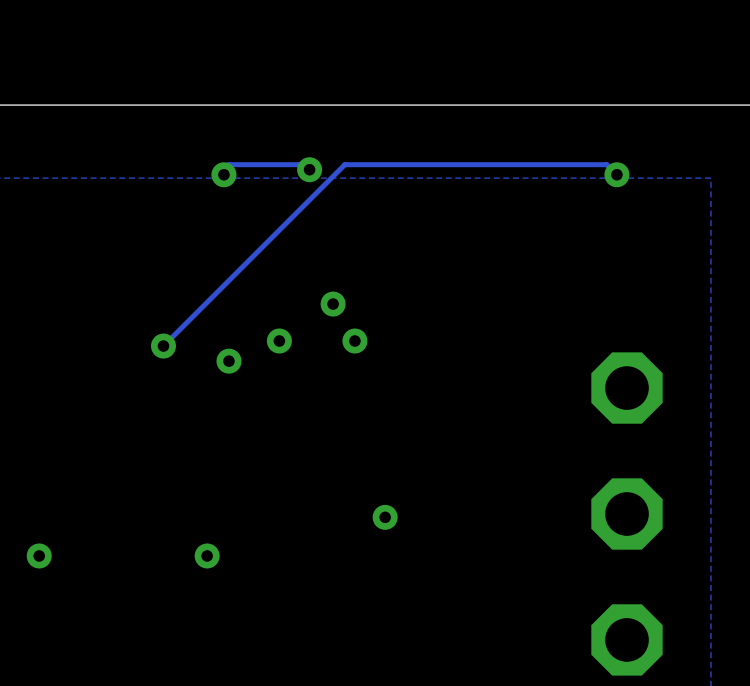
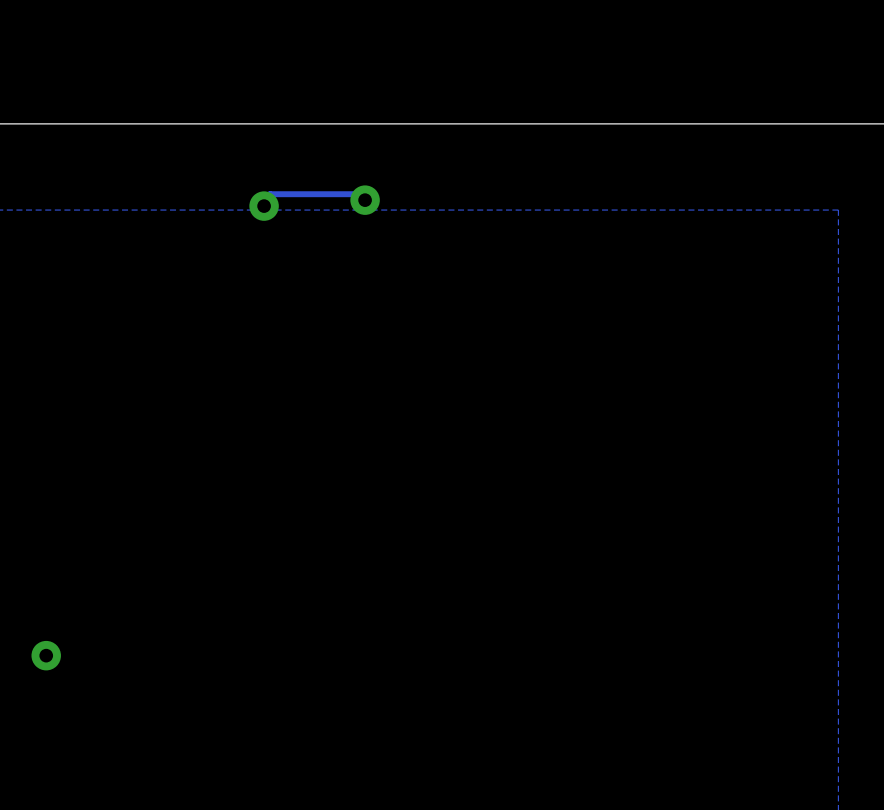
track: (616, 174) (606, 164) (344, 164) (163, 346) -> none
via: (616, 174) -> none
via: (333, 304) -> none
via: (279, 341) -> none
via: (354, 341) -> none
via: (163, 346) -> none
via: (228, 361) -> none
part: (626, 388) -> none
part: (626, 513) -> none
via: (385, 517) -> none
via: (207, 555) -> none
part: (626, 639) -> none

